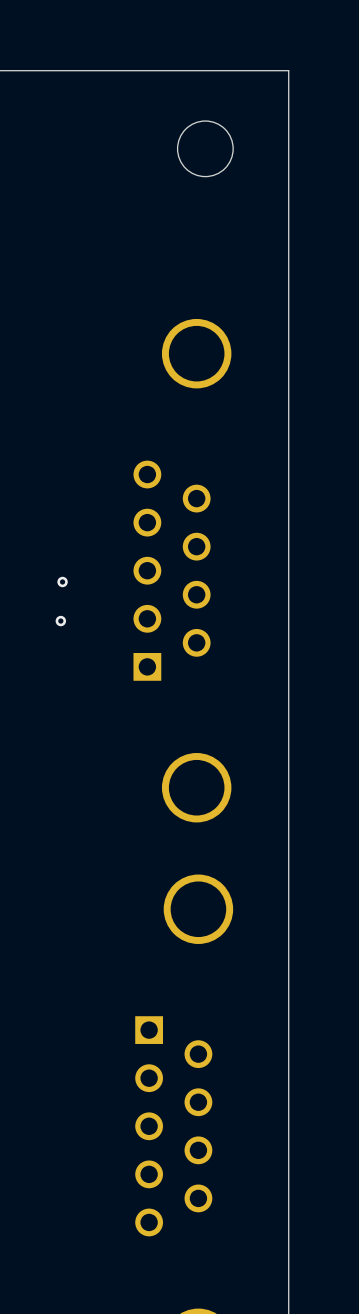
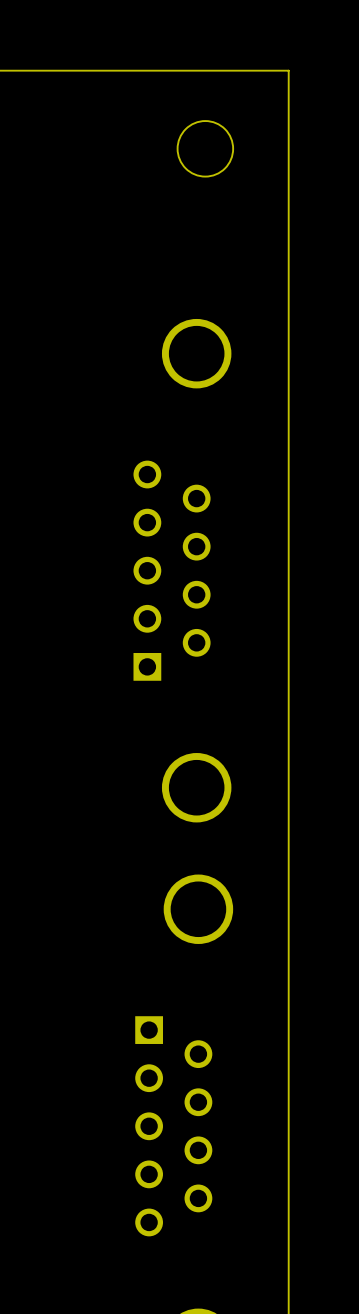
via: (62, 581) -> none
via: (60, 621) -> none

